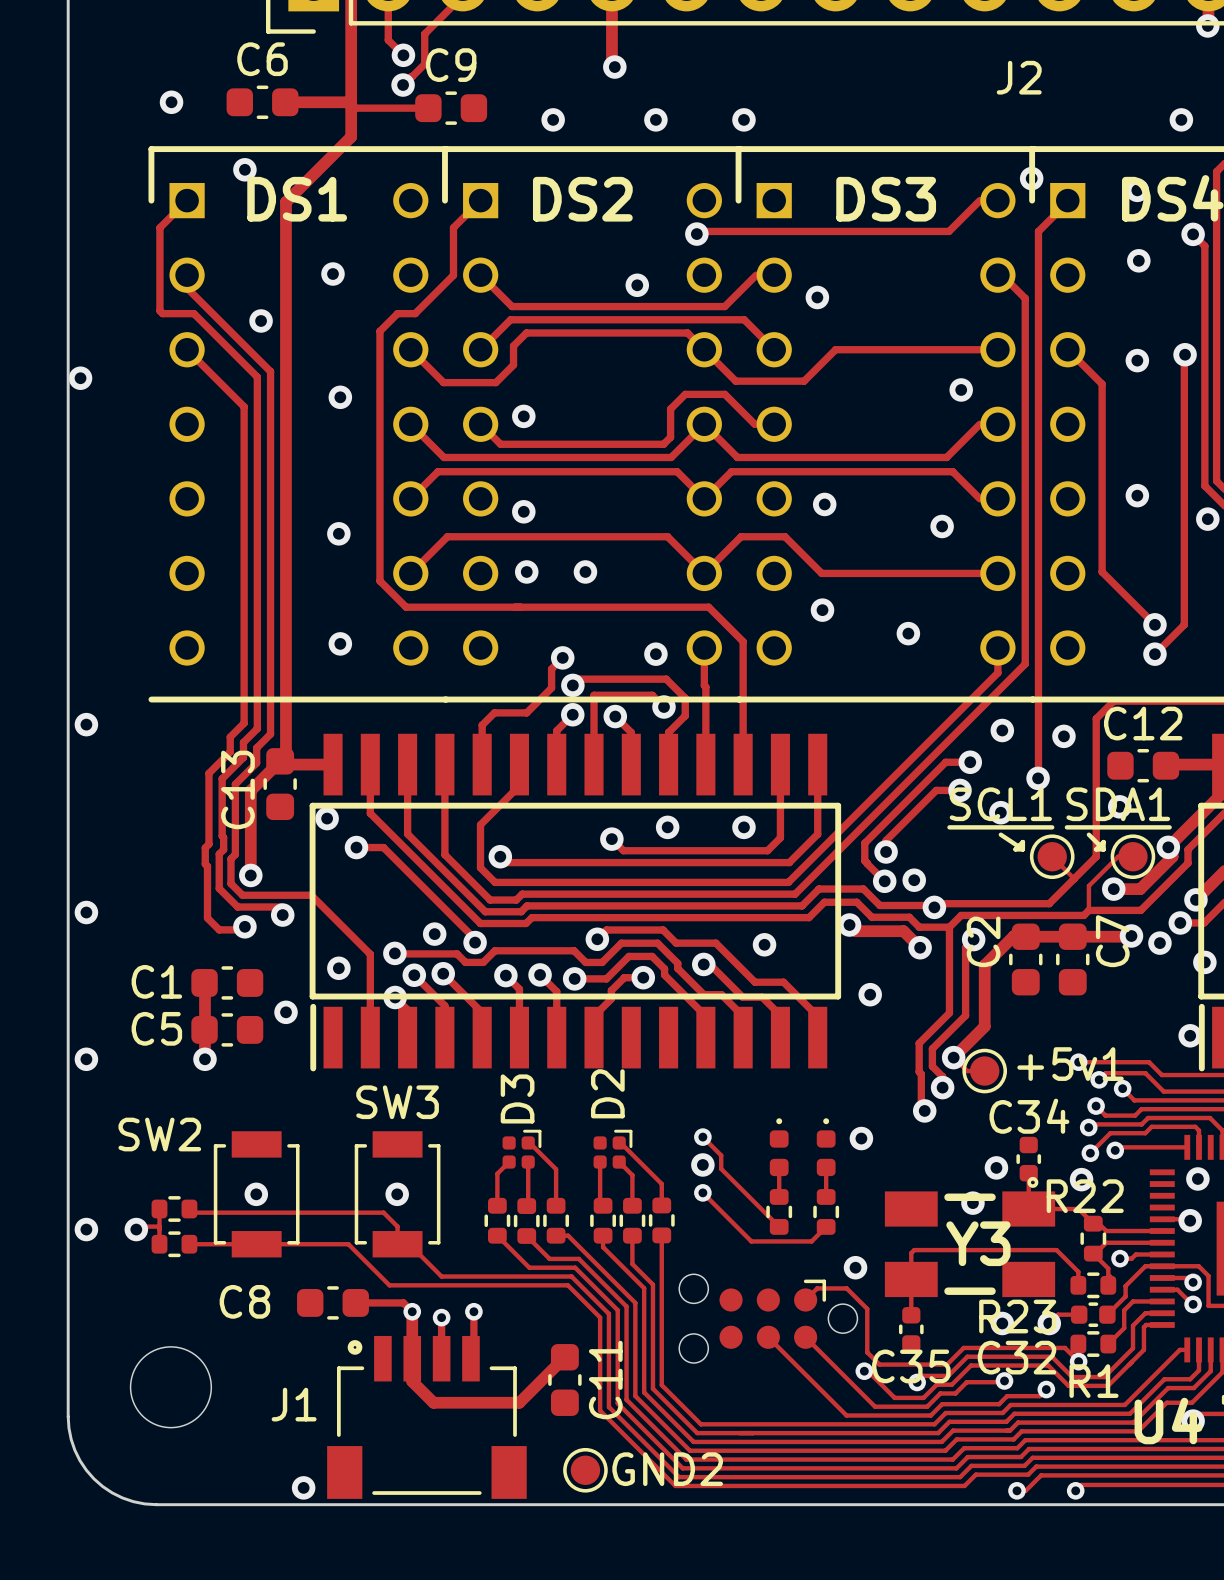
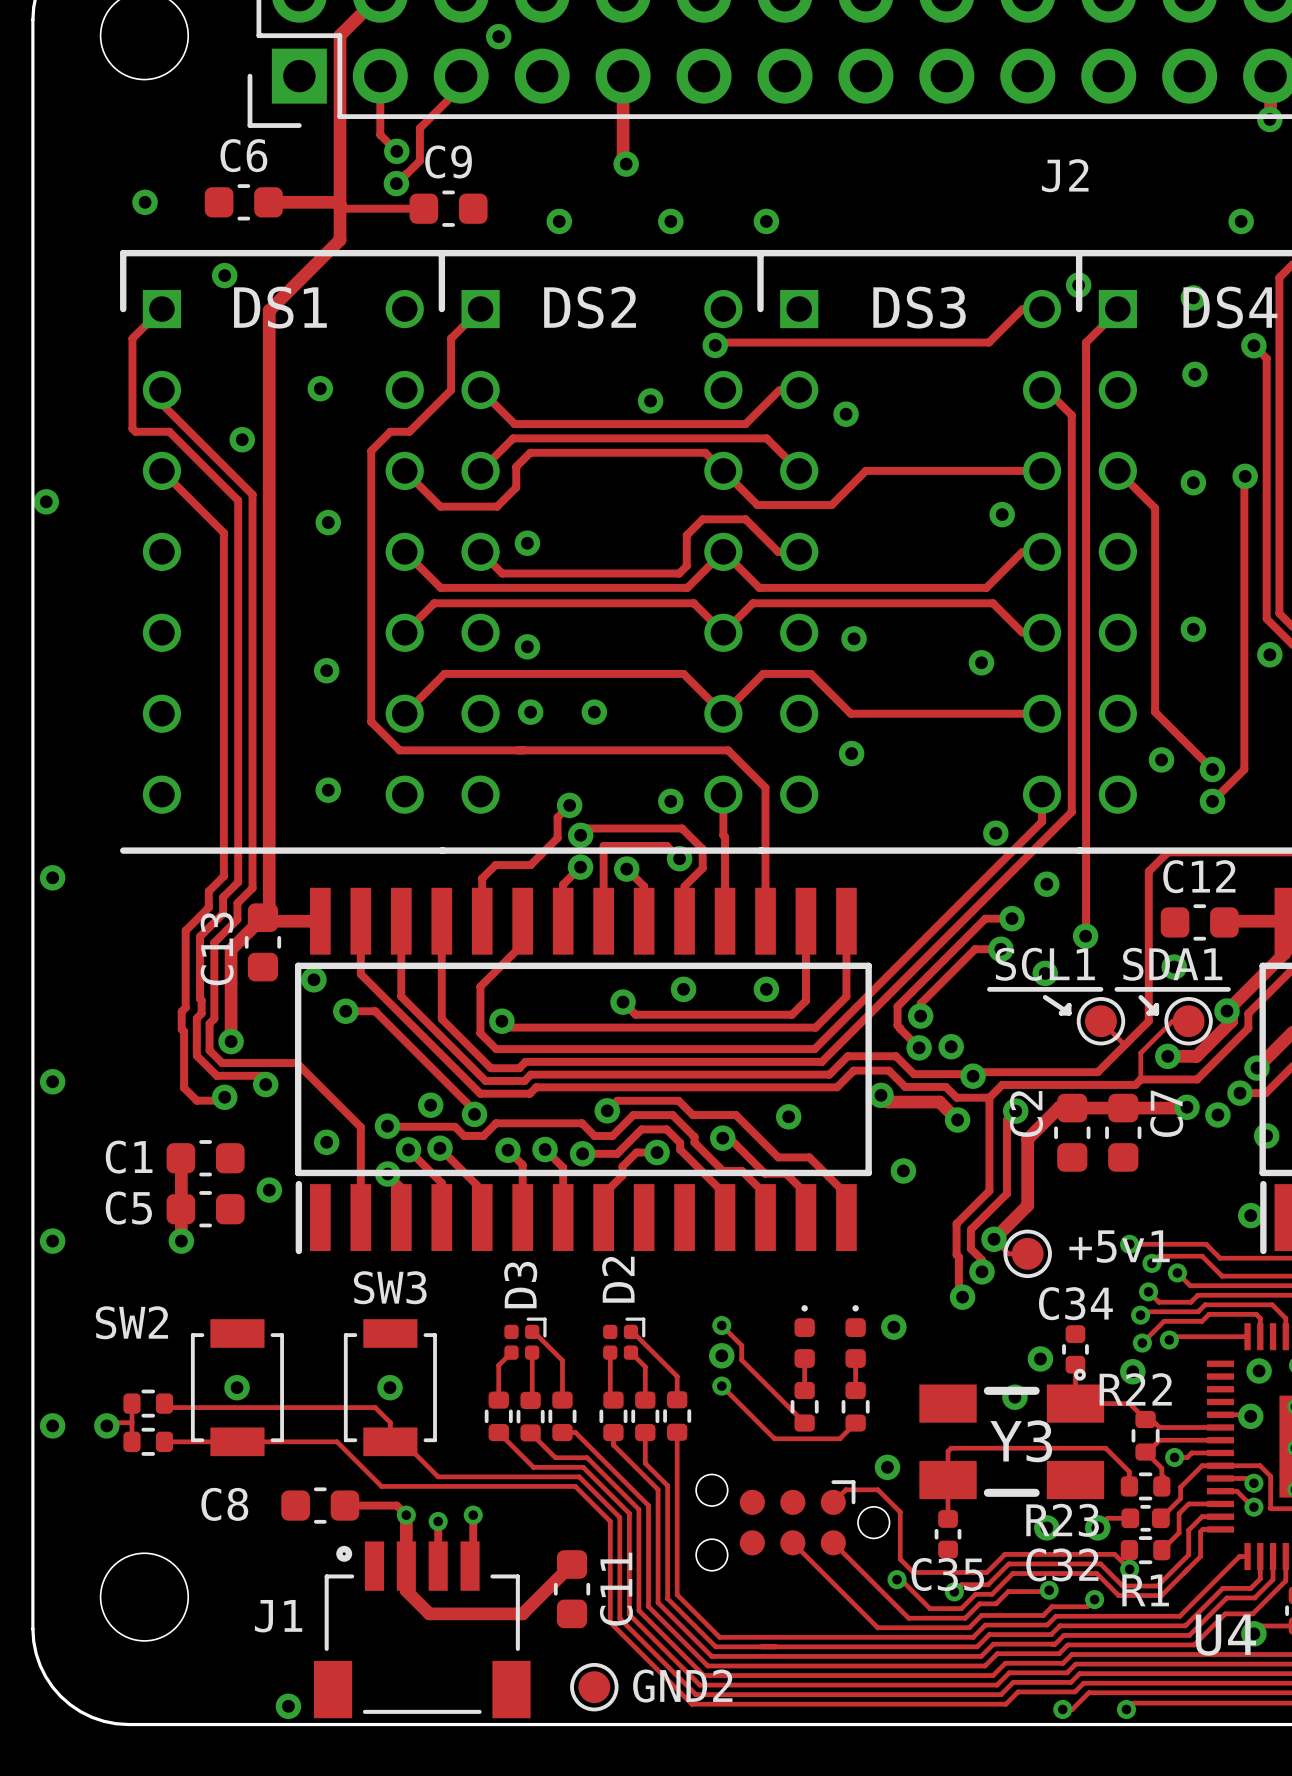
via: none -> (1161, 759)
via: (908, 633) -> none
via: none -> (995, 833)
via: (1063, 736) -> none

